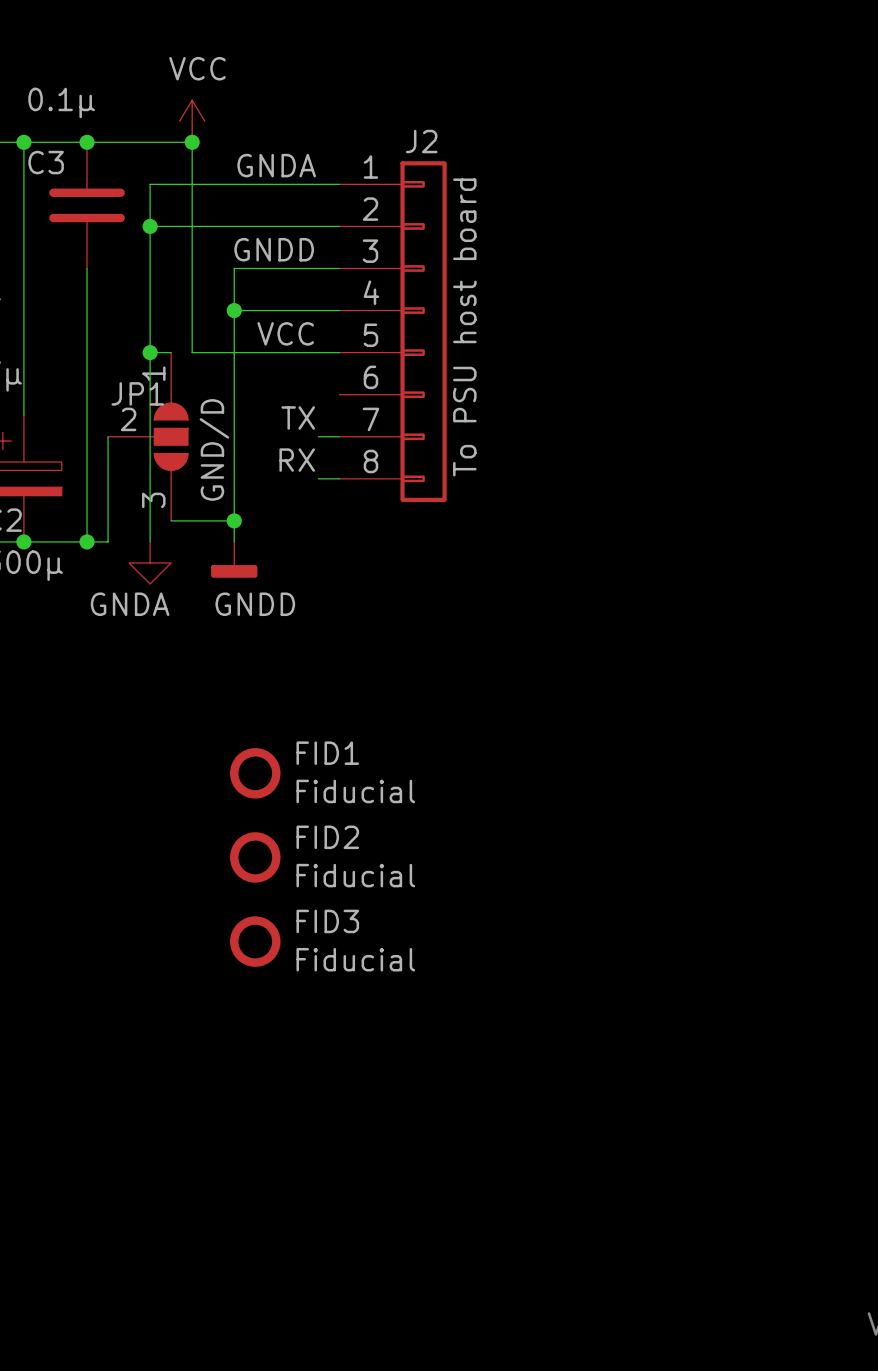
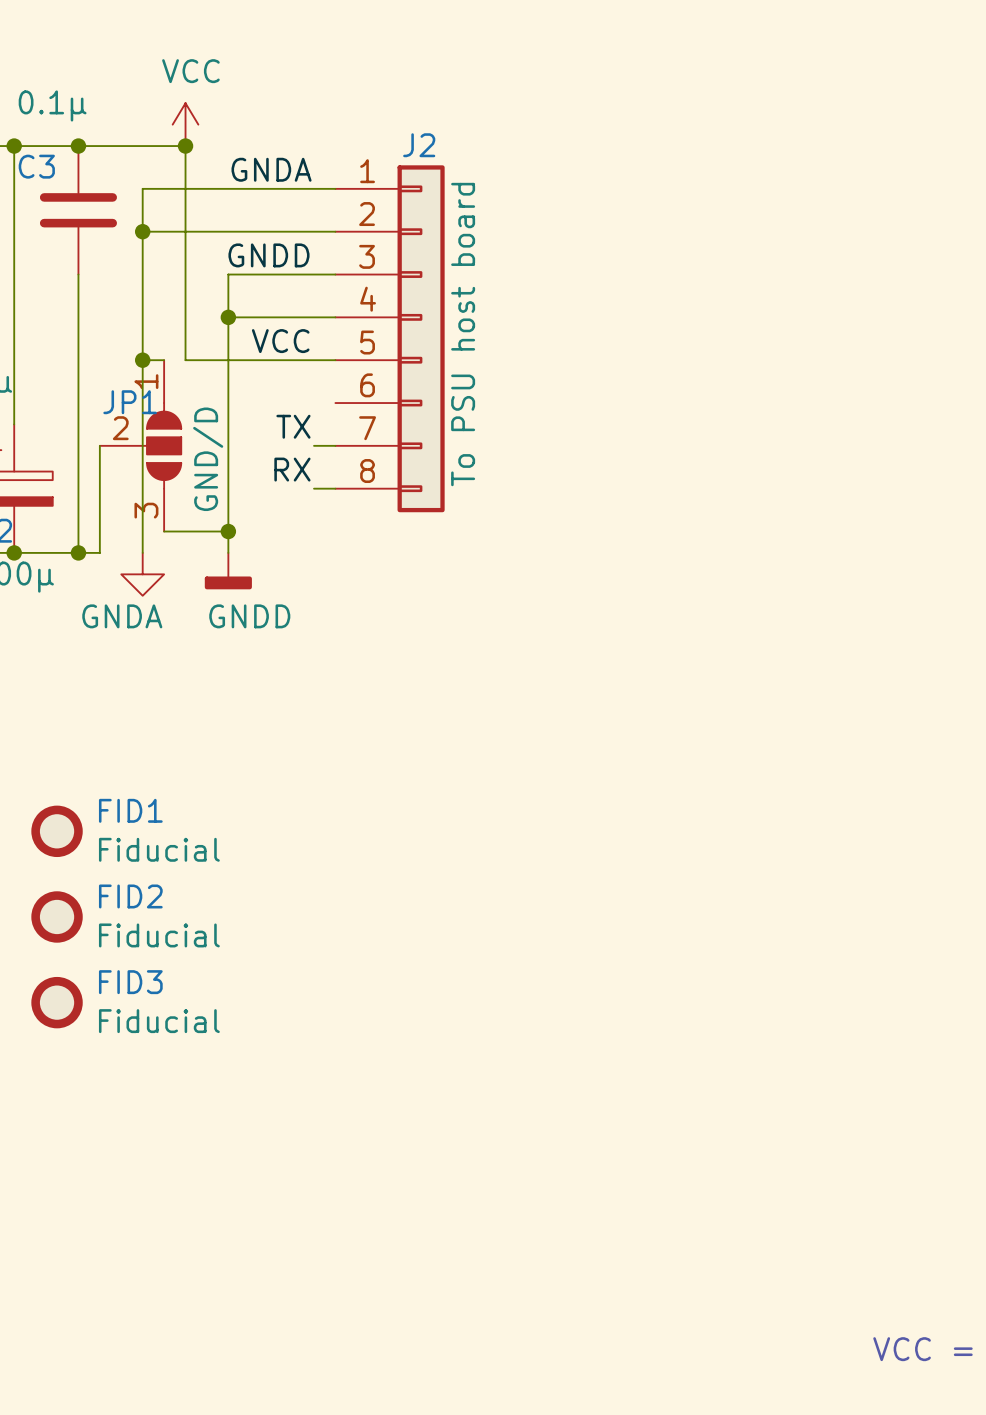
FID1 position: (255, 773) -> (57, 831)
FID2 position: (255, 857) -> (57, 916)
FID3 position: (255, 941) -> (57, 1002)

